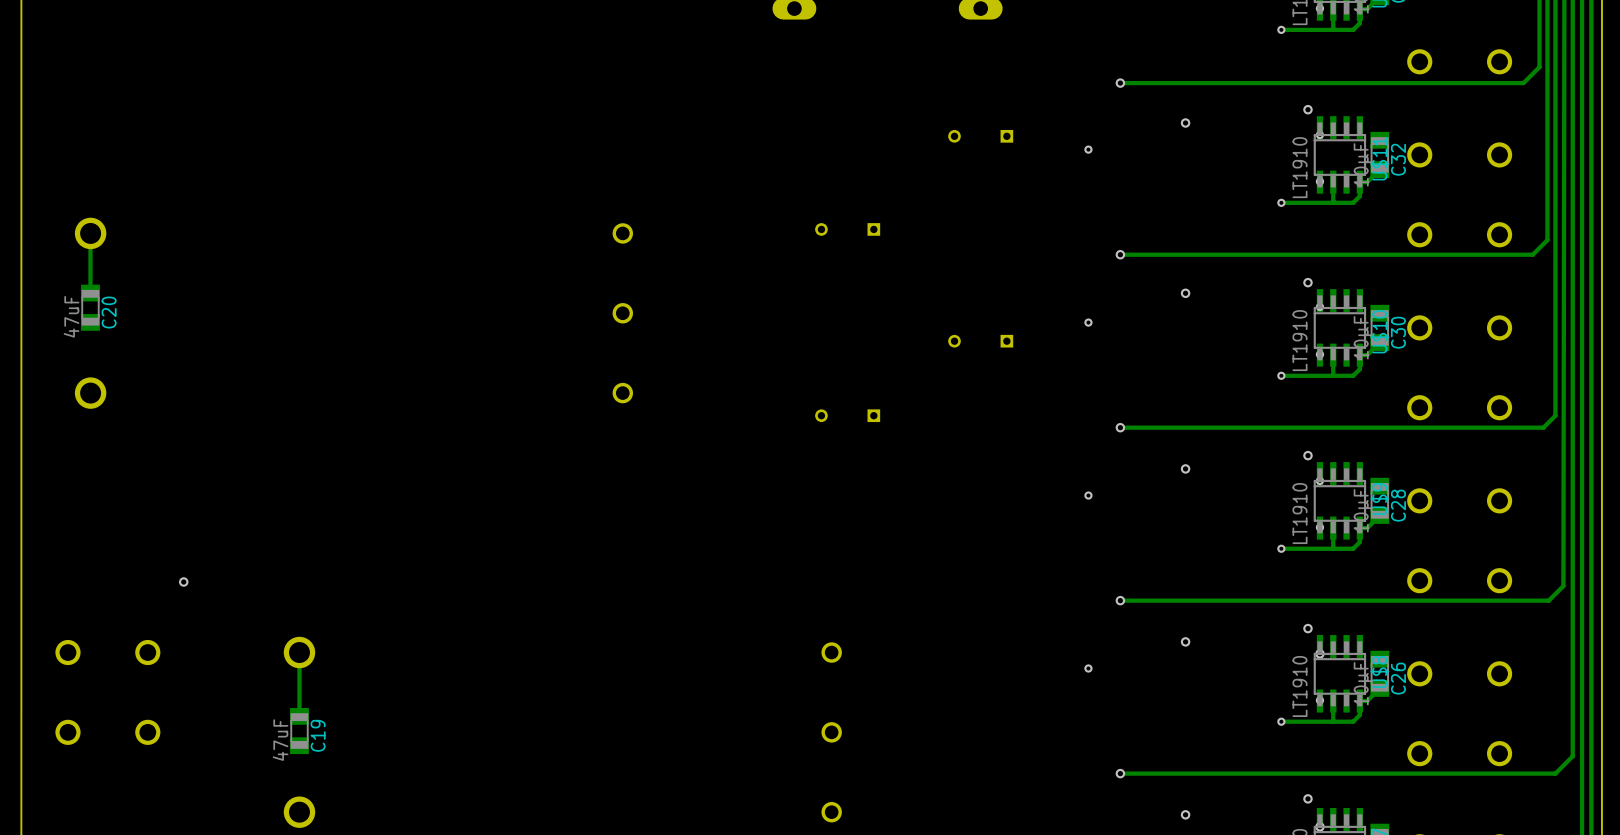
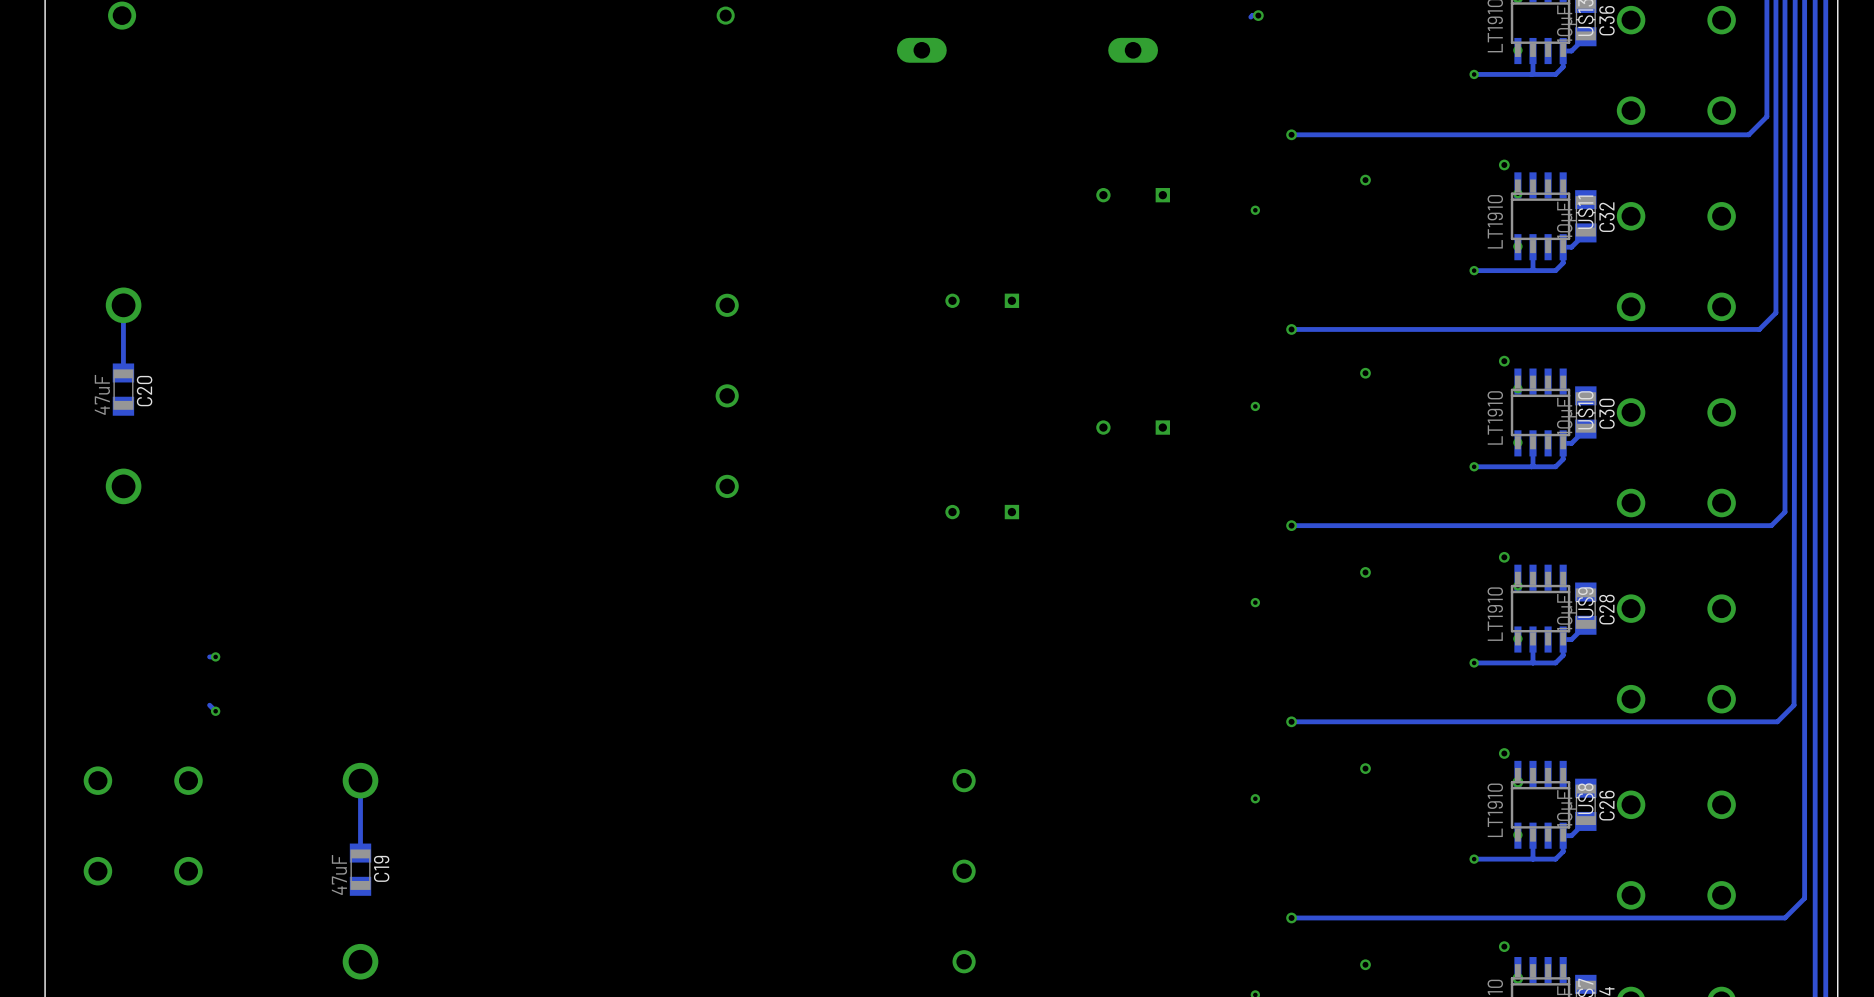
track: none -> (215, 656) (209, 656)
via: none -> (215, 656)
via: (183, 582) -> none
track: none -> (209, 705) (215, 711)
via: none -> (215, 711)

